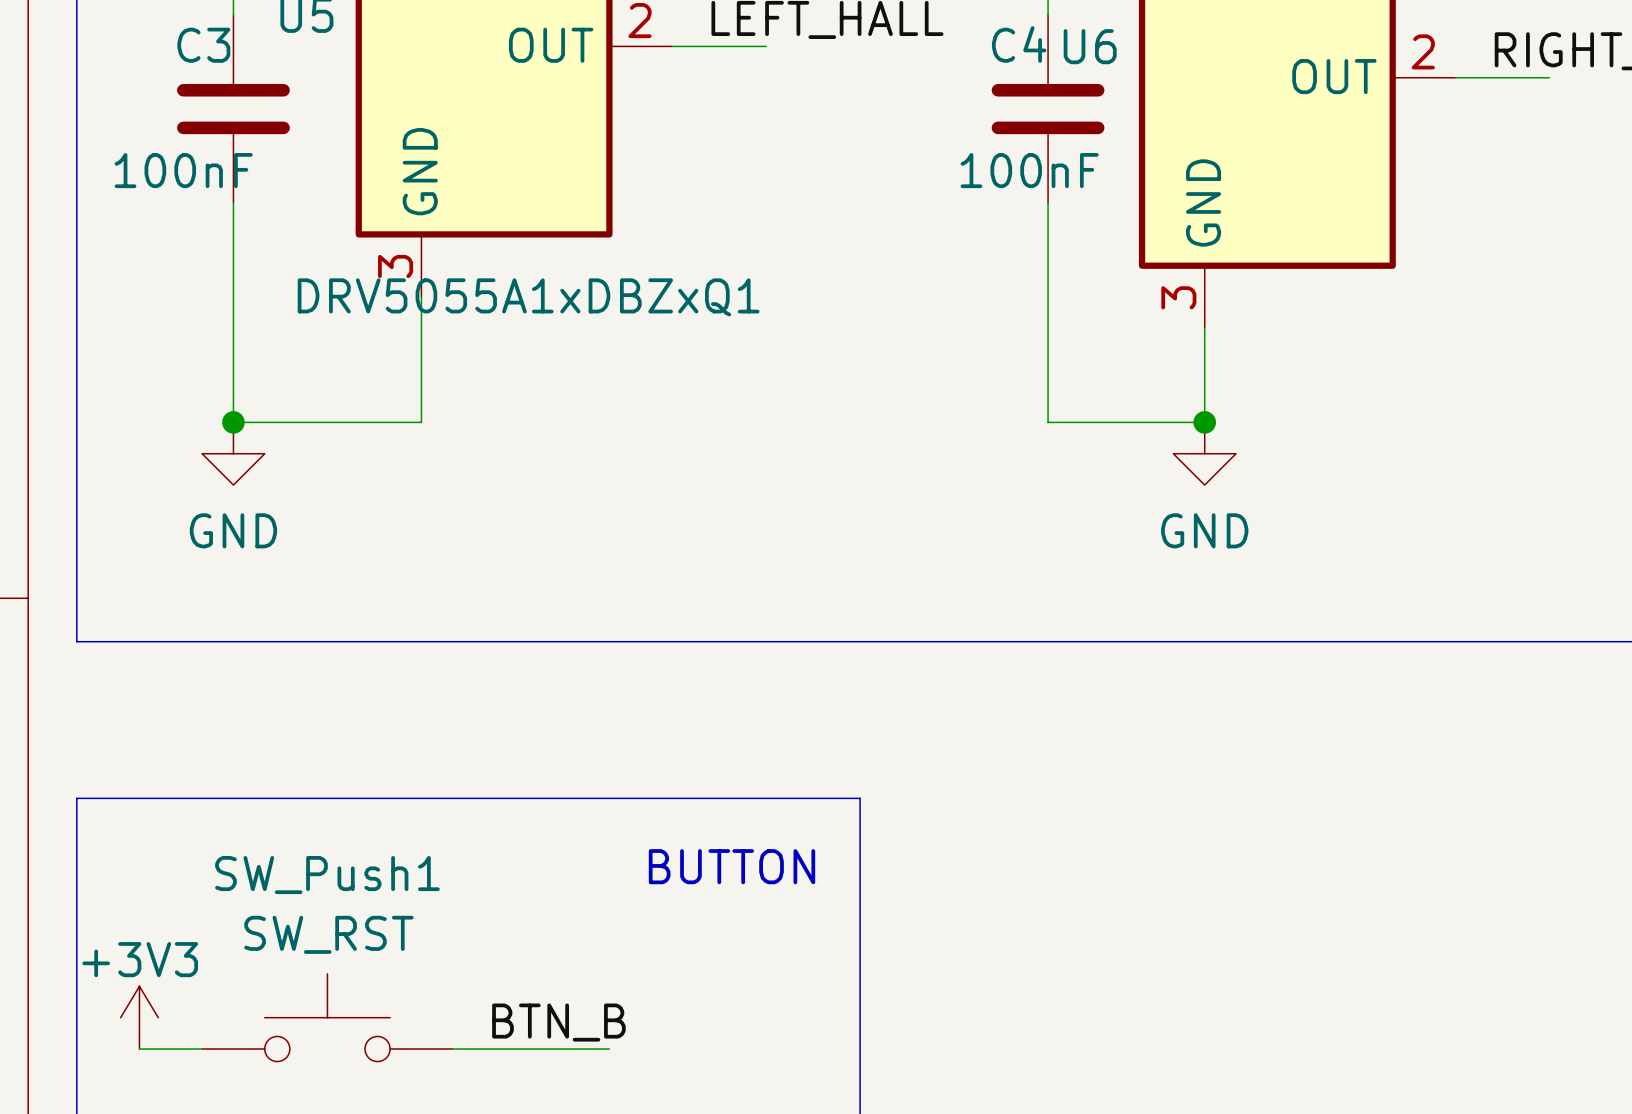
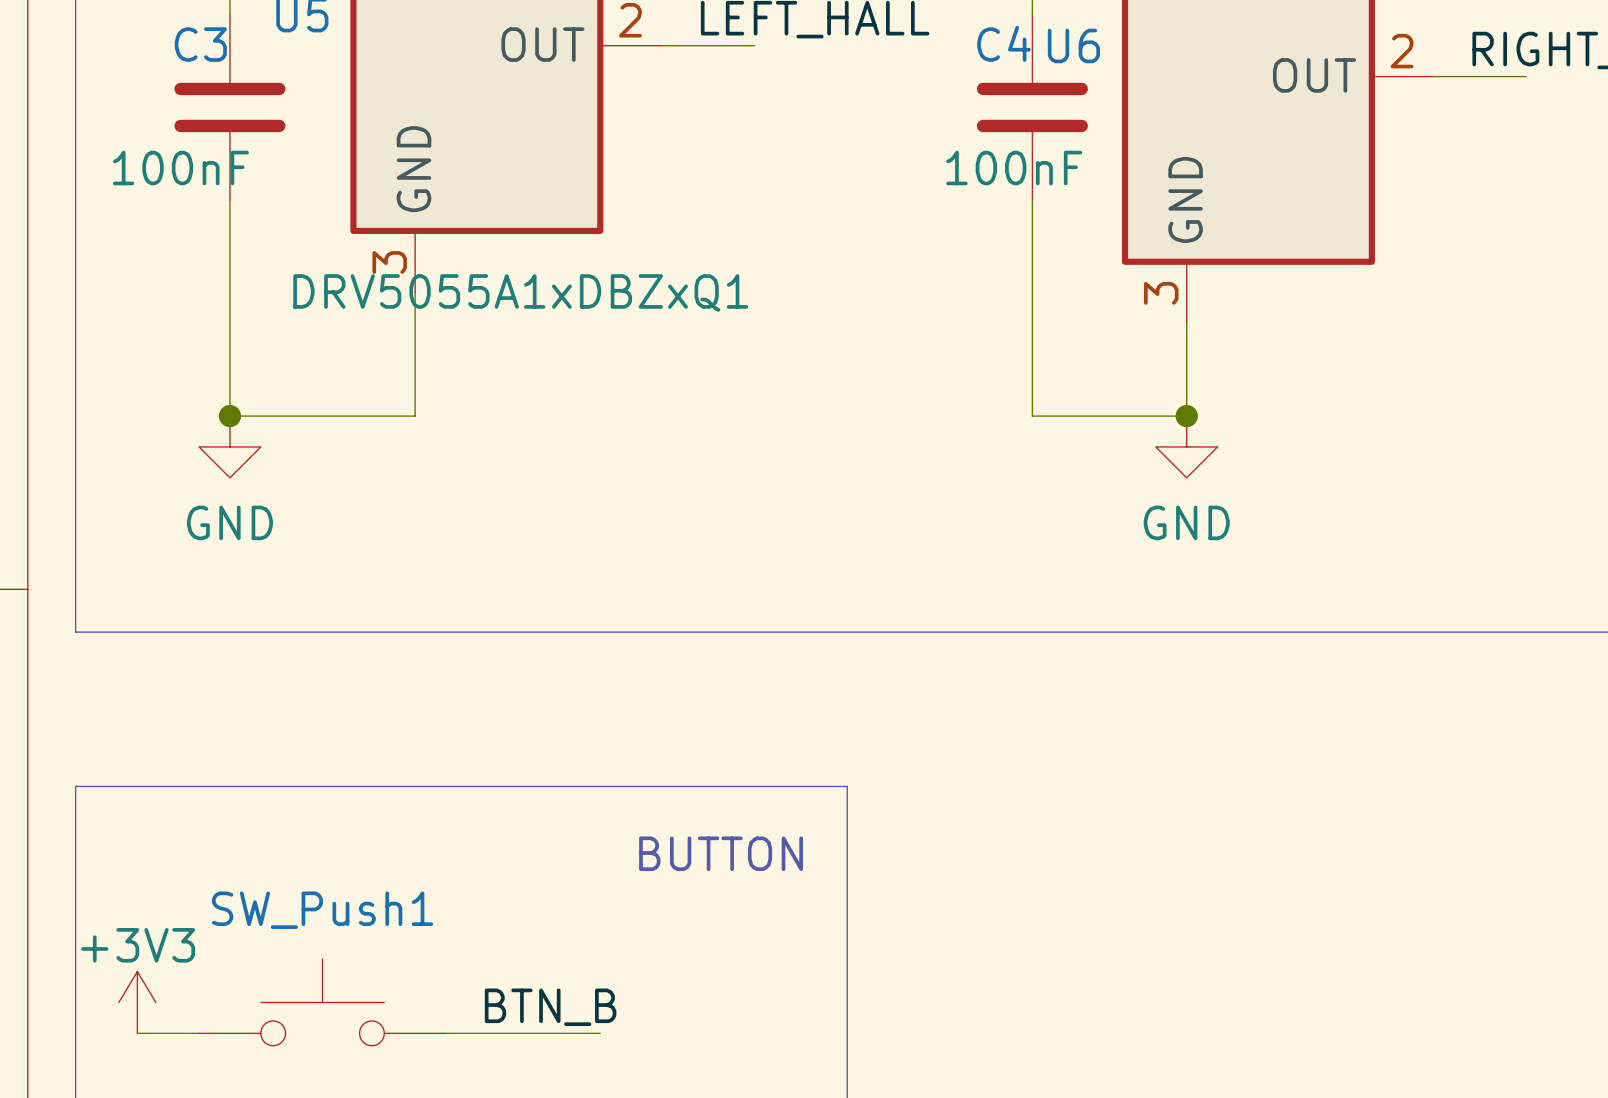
SW_Push1 name position: SW_Push1 (327, 875) -> SW_Push1 (322, 910)
SW_Push1 value: SW_RST (328, 934) -> none

